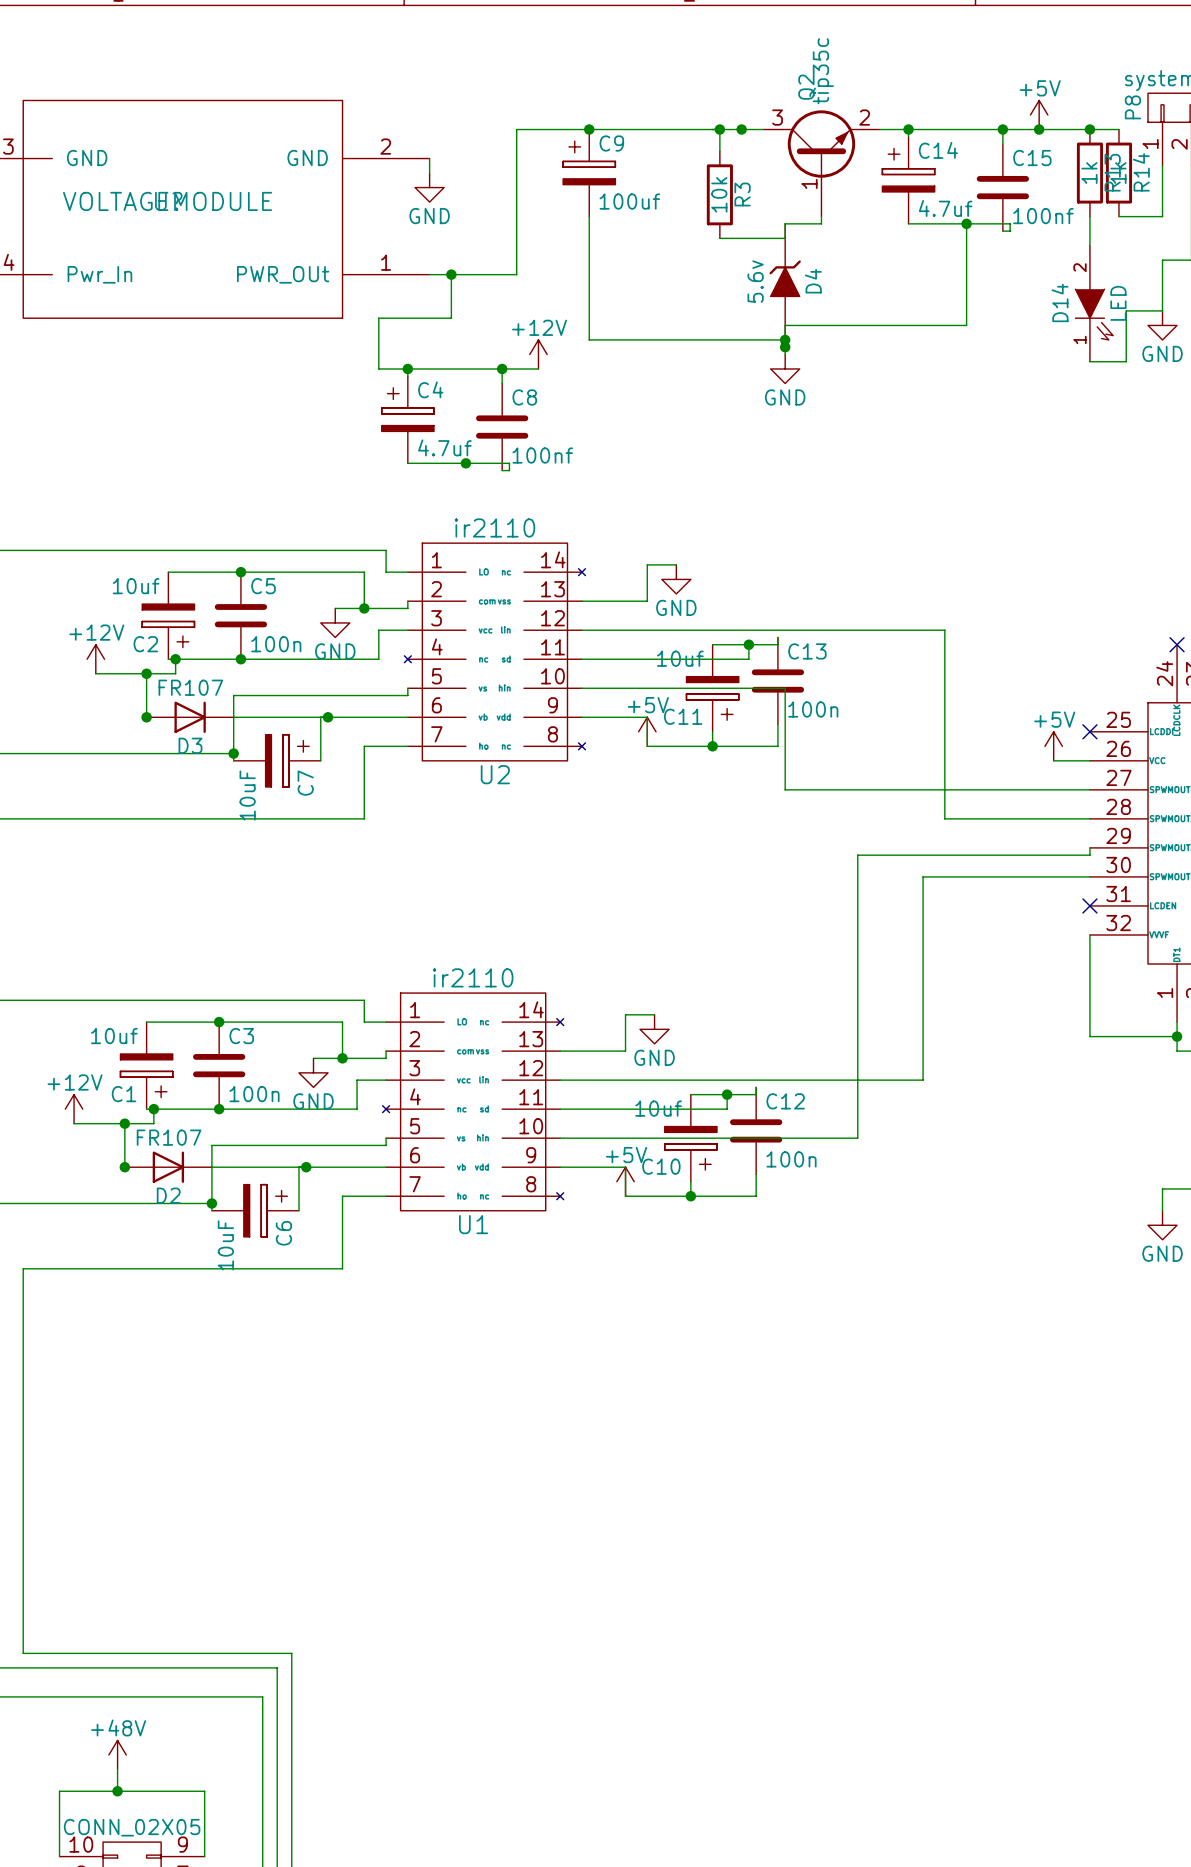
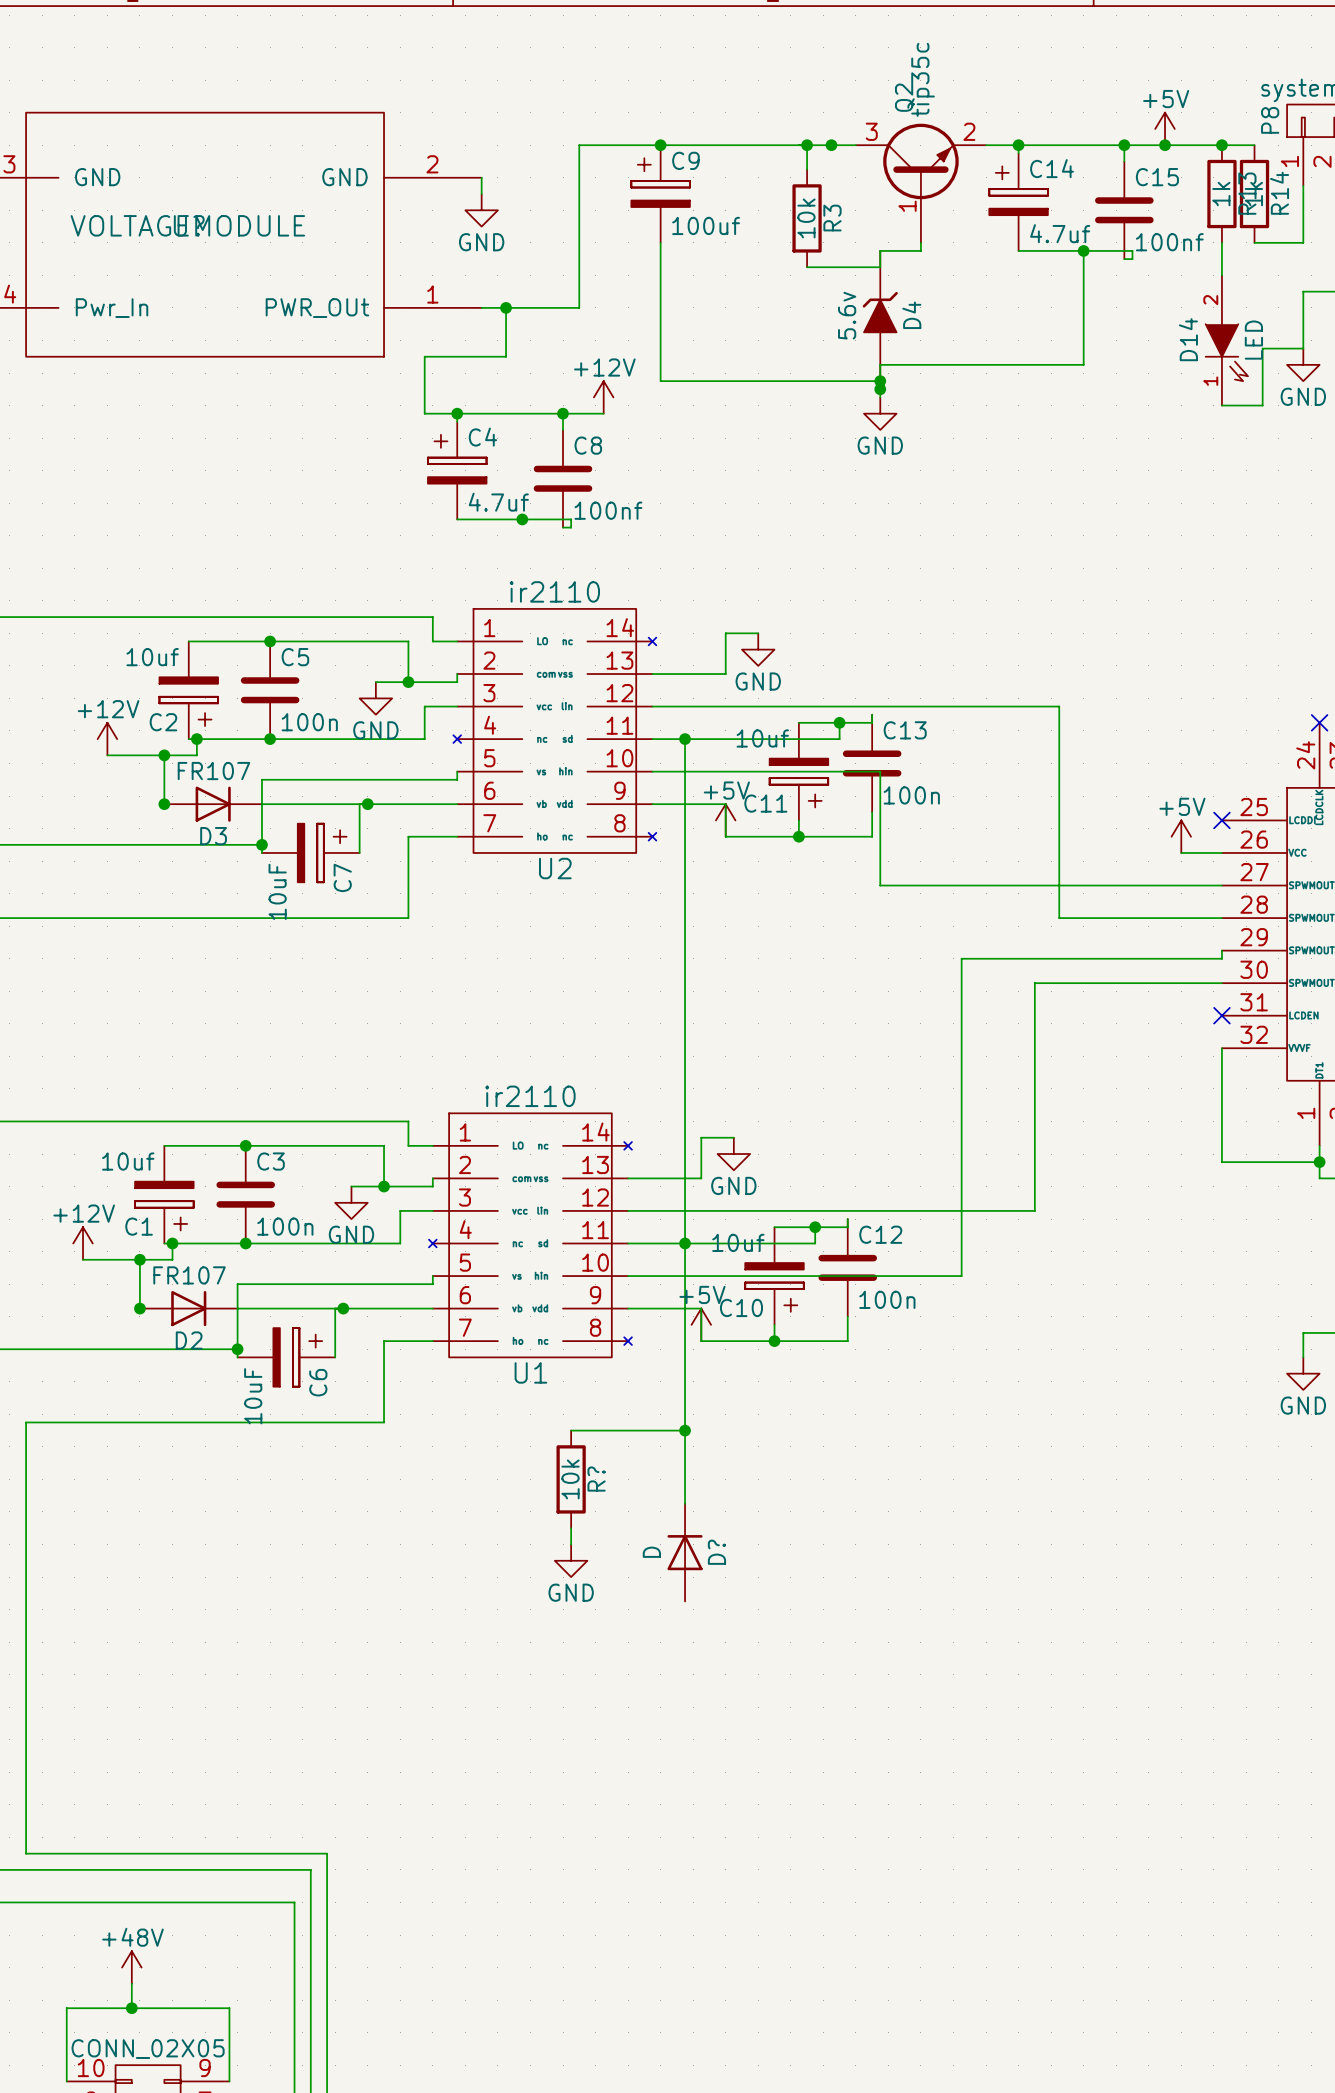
wire: none -> (685, 739) (685, 1503)
junction: none -> (685, 739)
junction: none -> (685, 1243)
wire: none -> (571, 1430) (685, 1430)
junction: none -> (685, 1430)
R?: none -> 10k (571, 1479)
wire: none -> (571, 1528) (571, 1544)
D?: none -> D (685, 1552)
power symbol: none -> GND (571, 1560)

